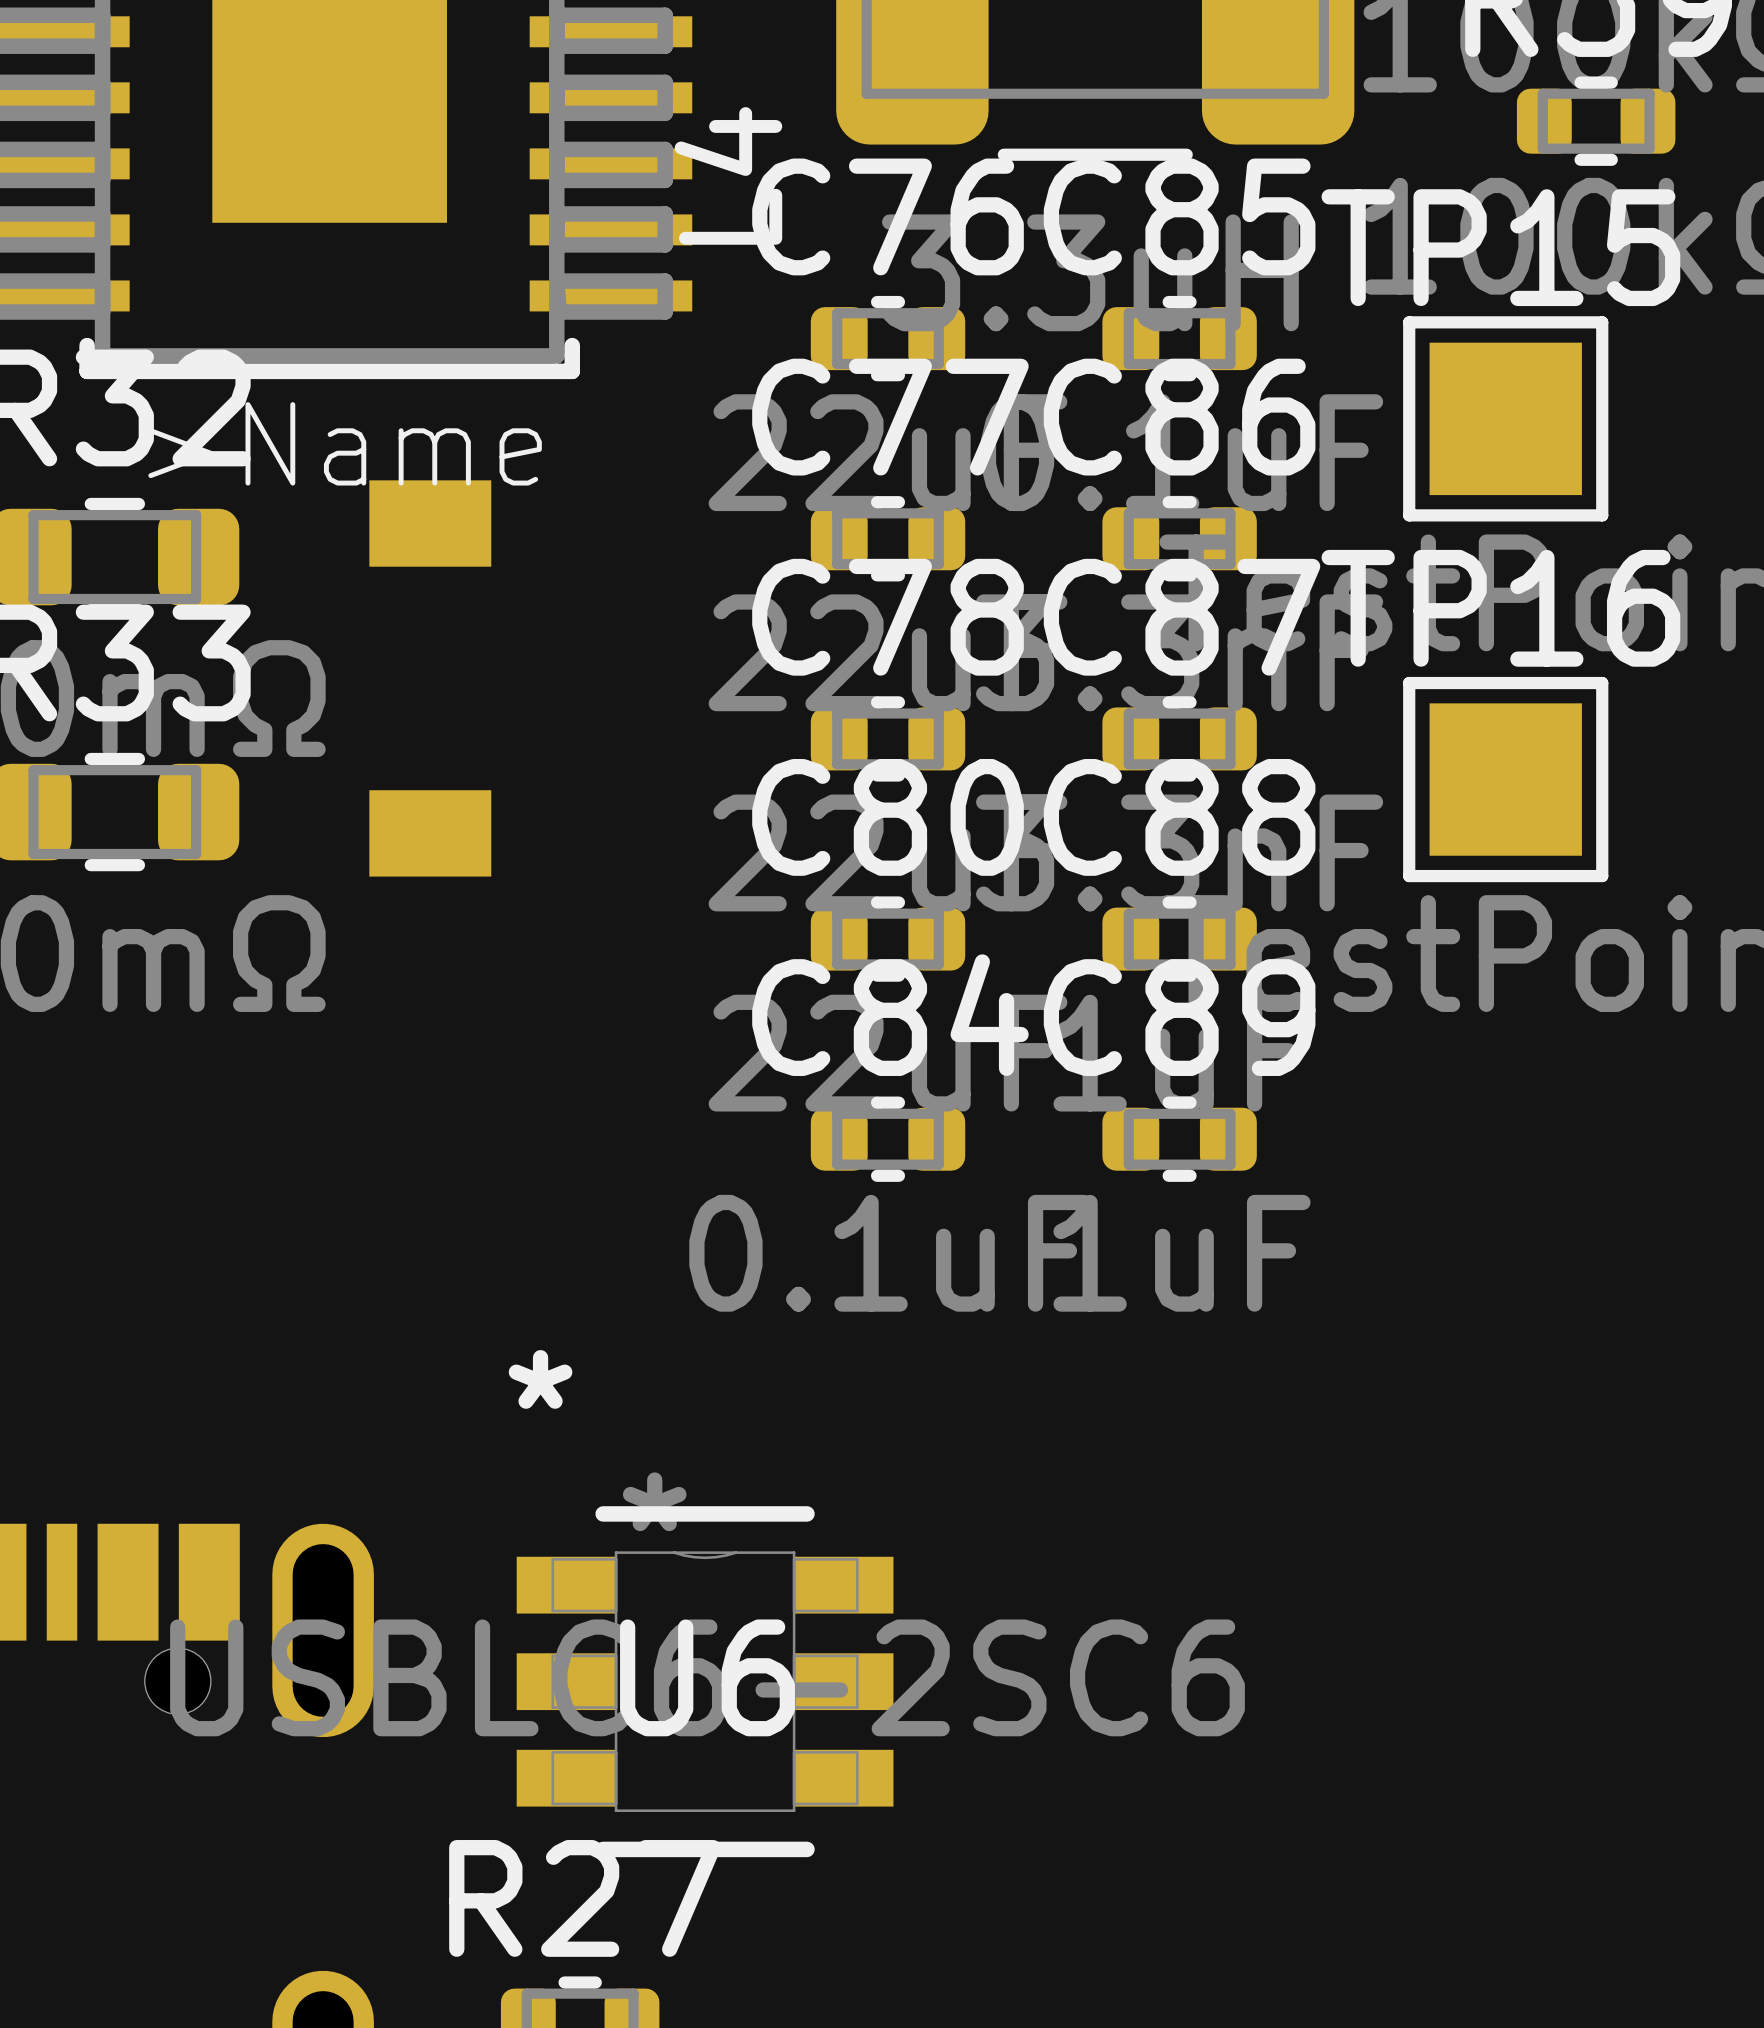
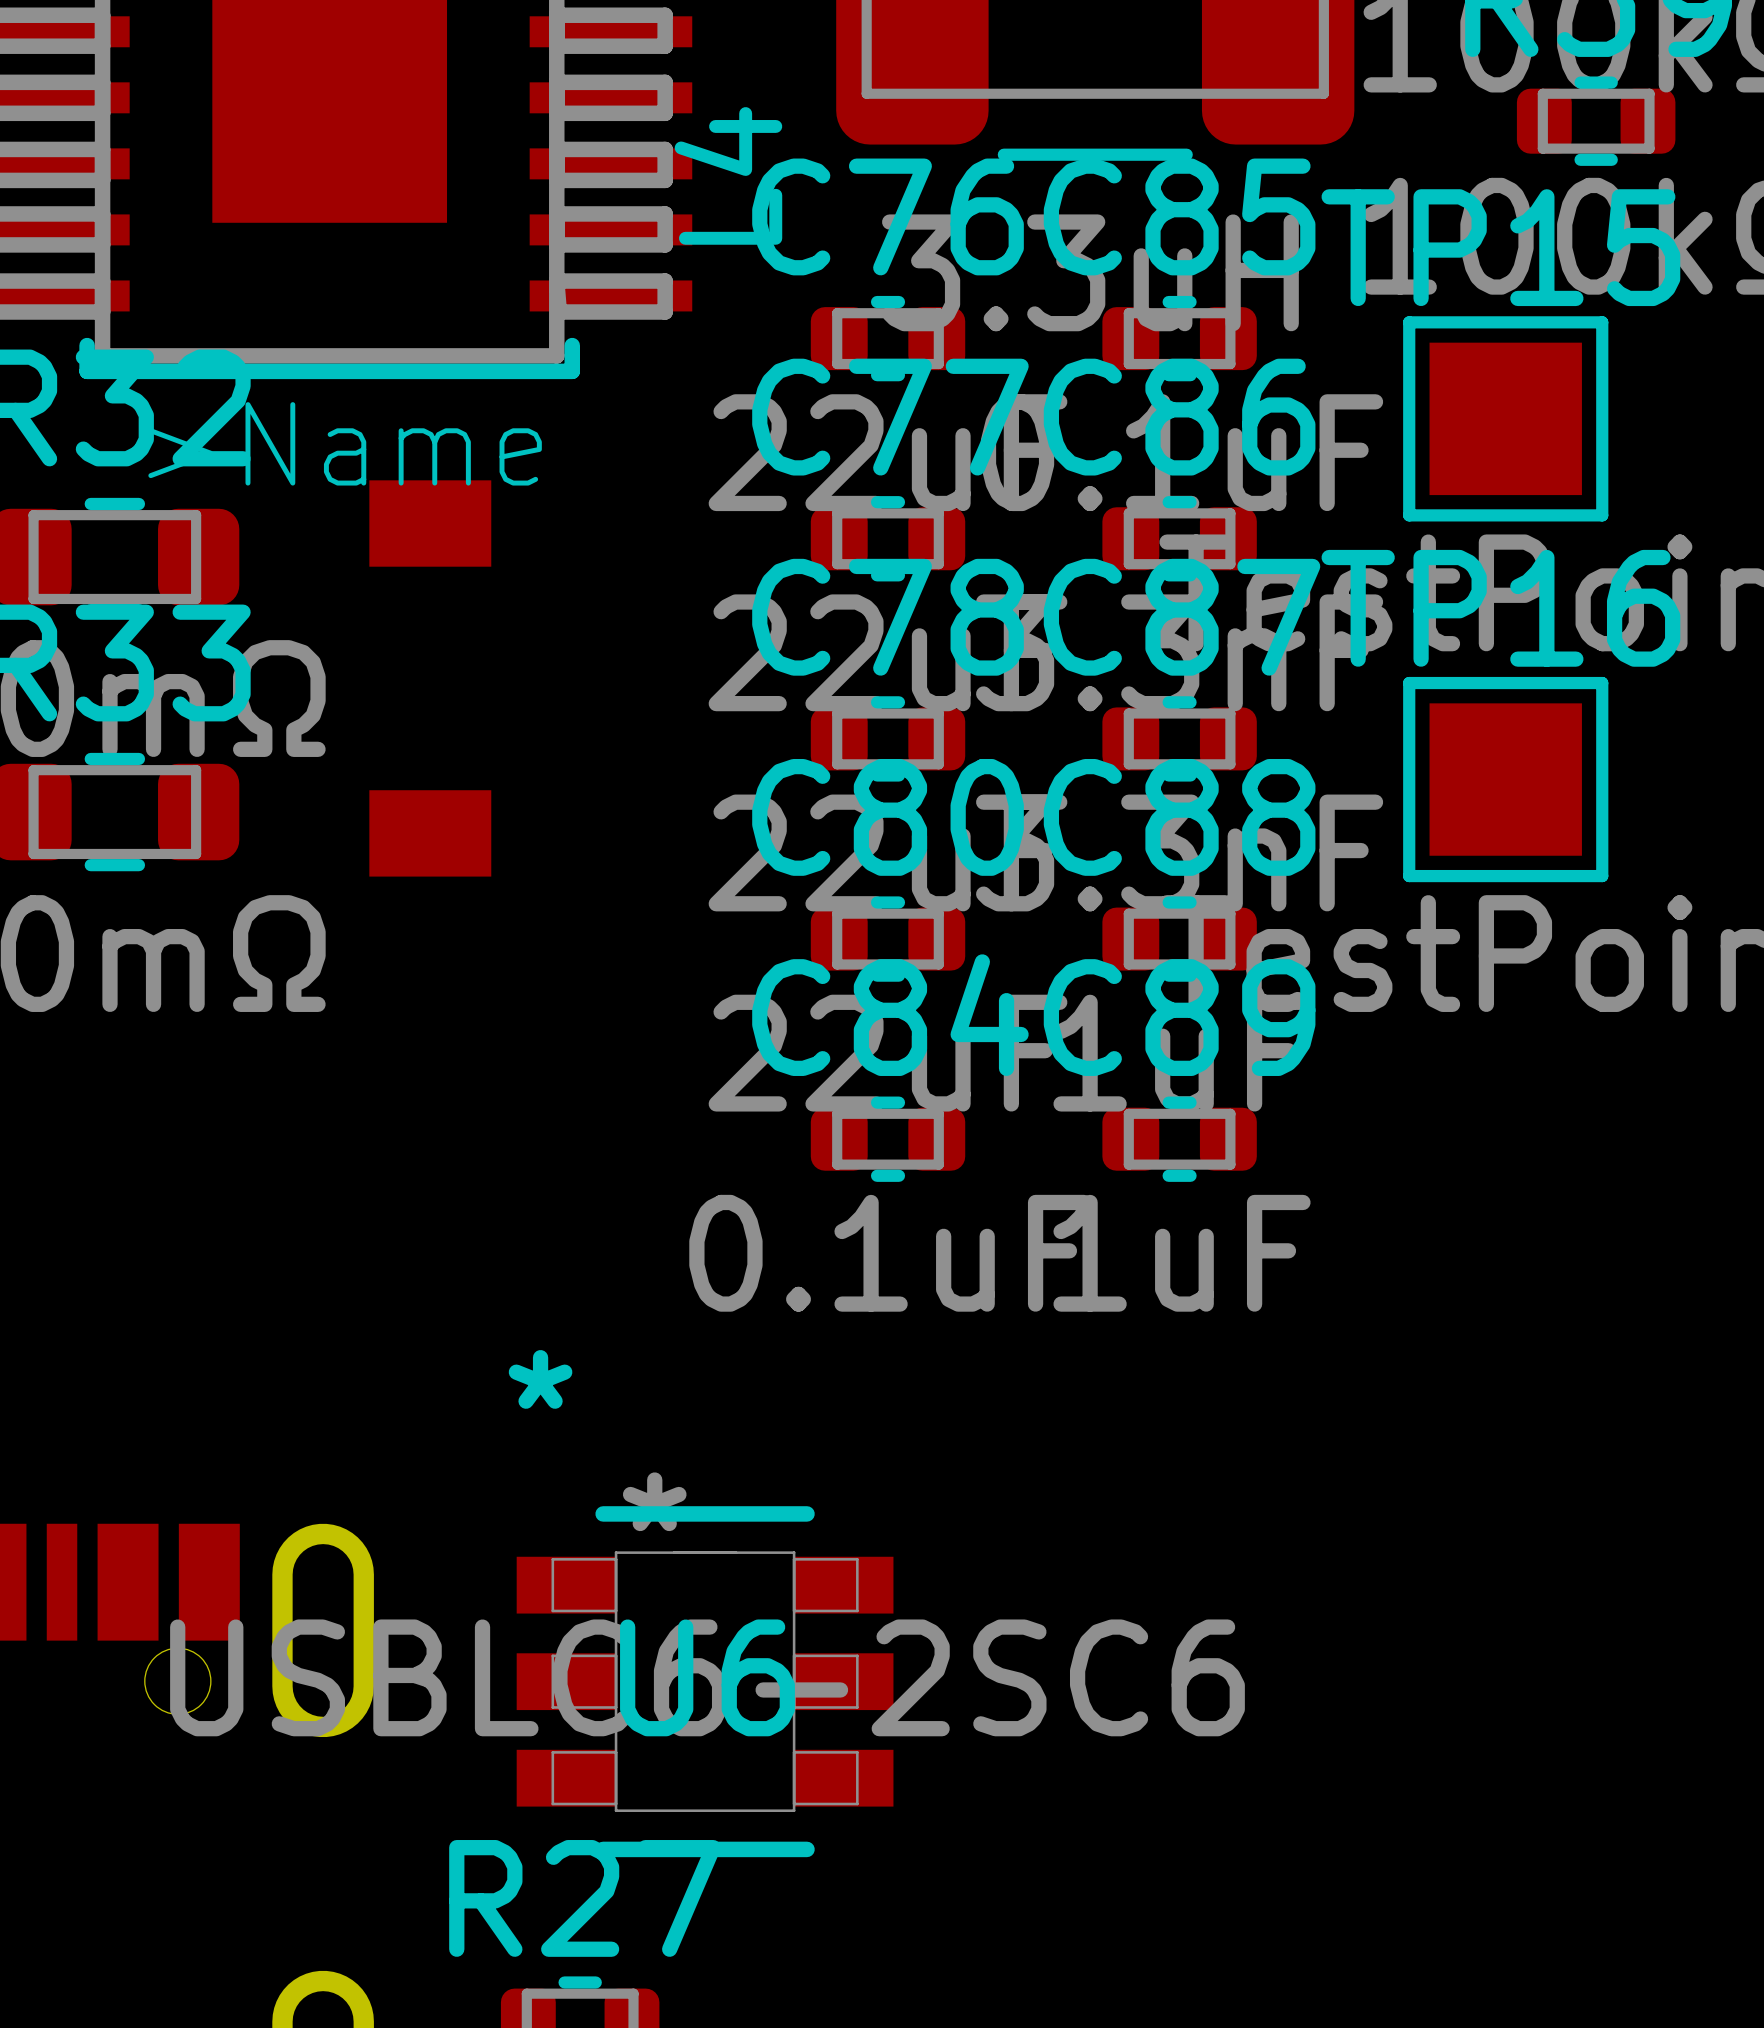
U6 footprint: [516, 1506, 894, 1858] -> [516, 1506, 894, 1858]

